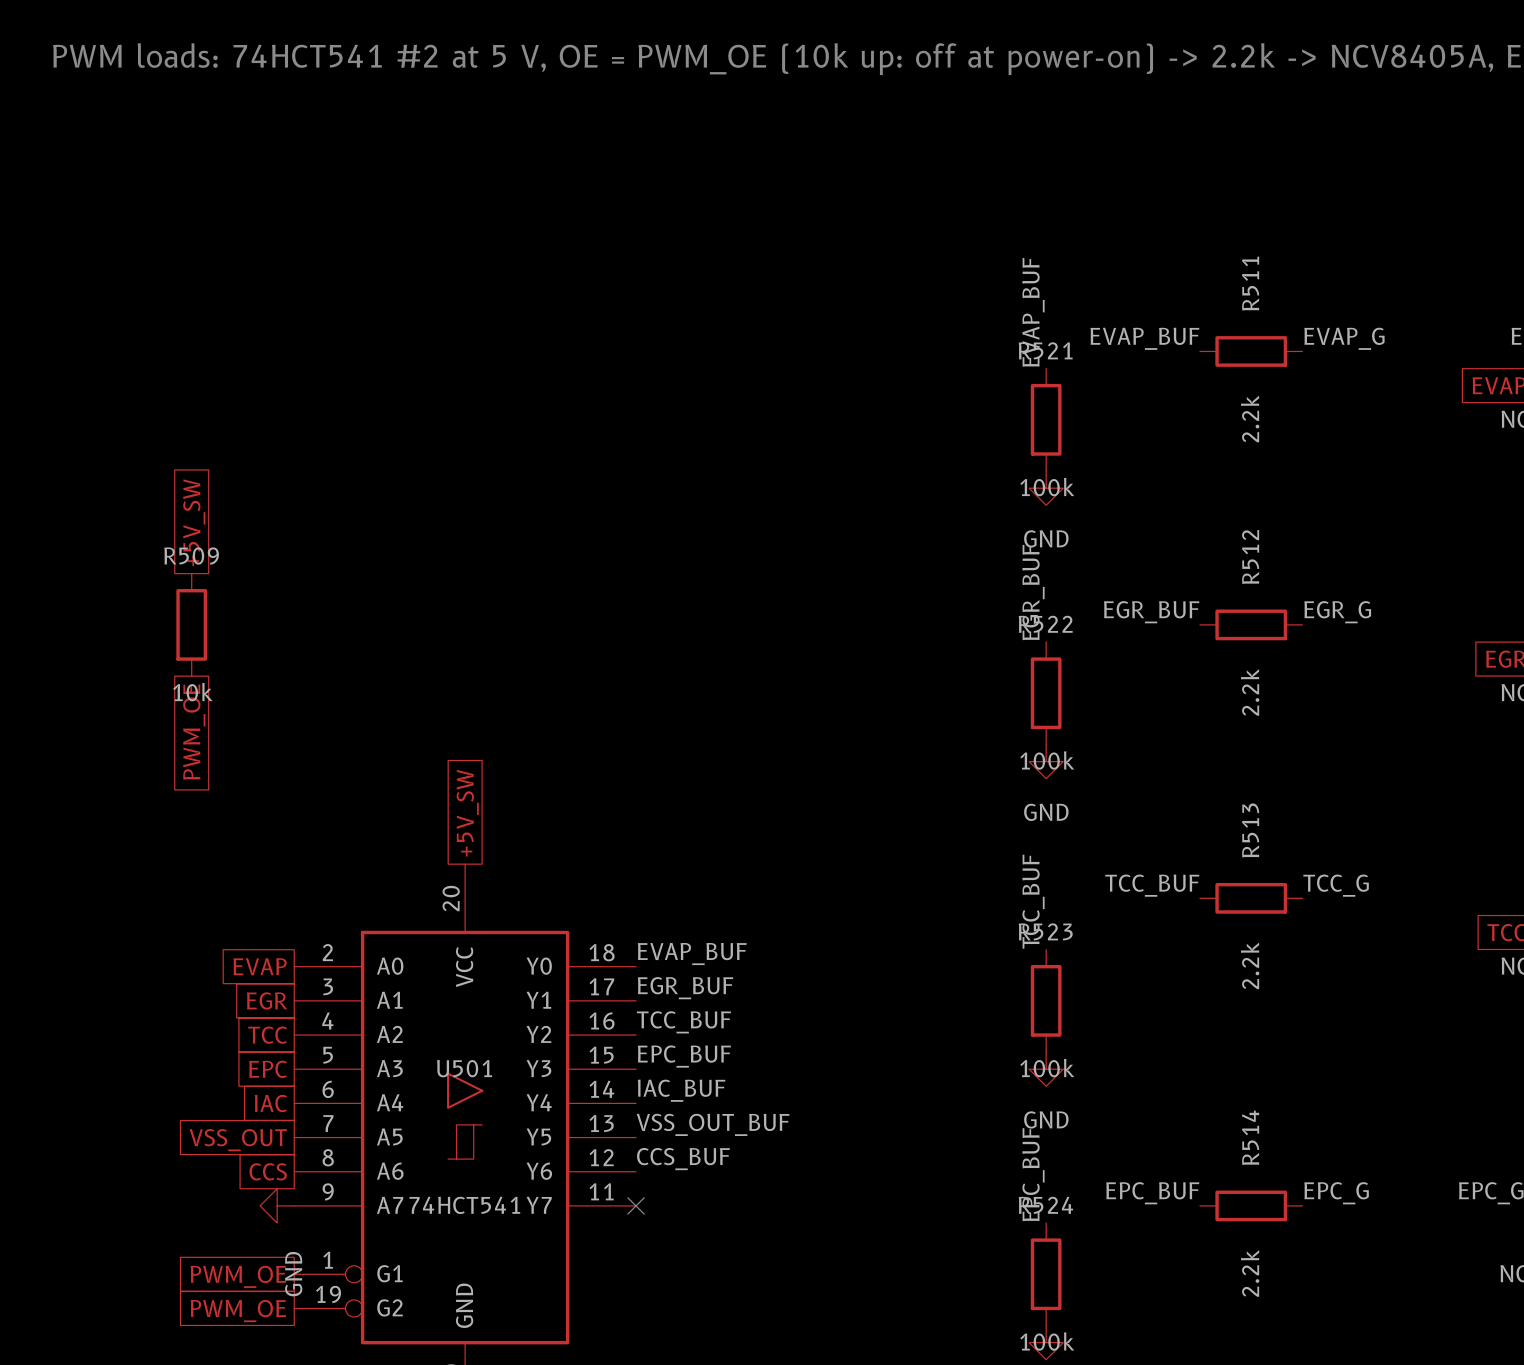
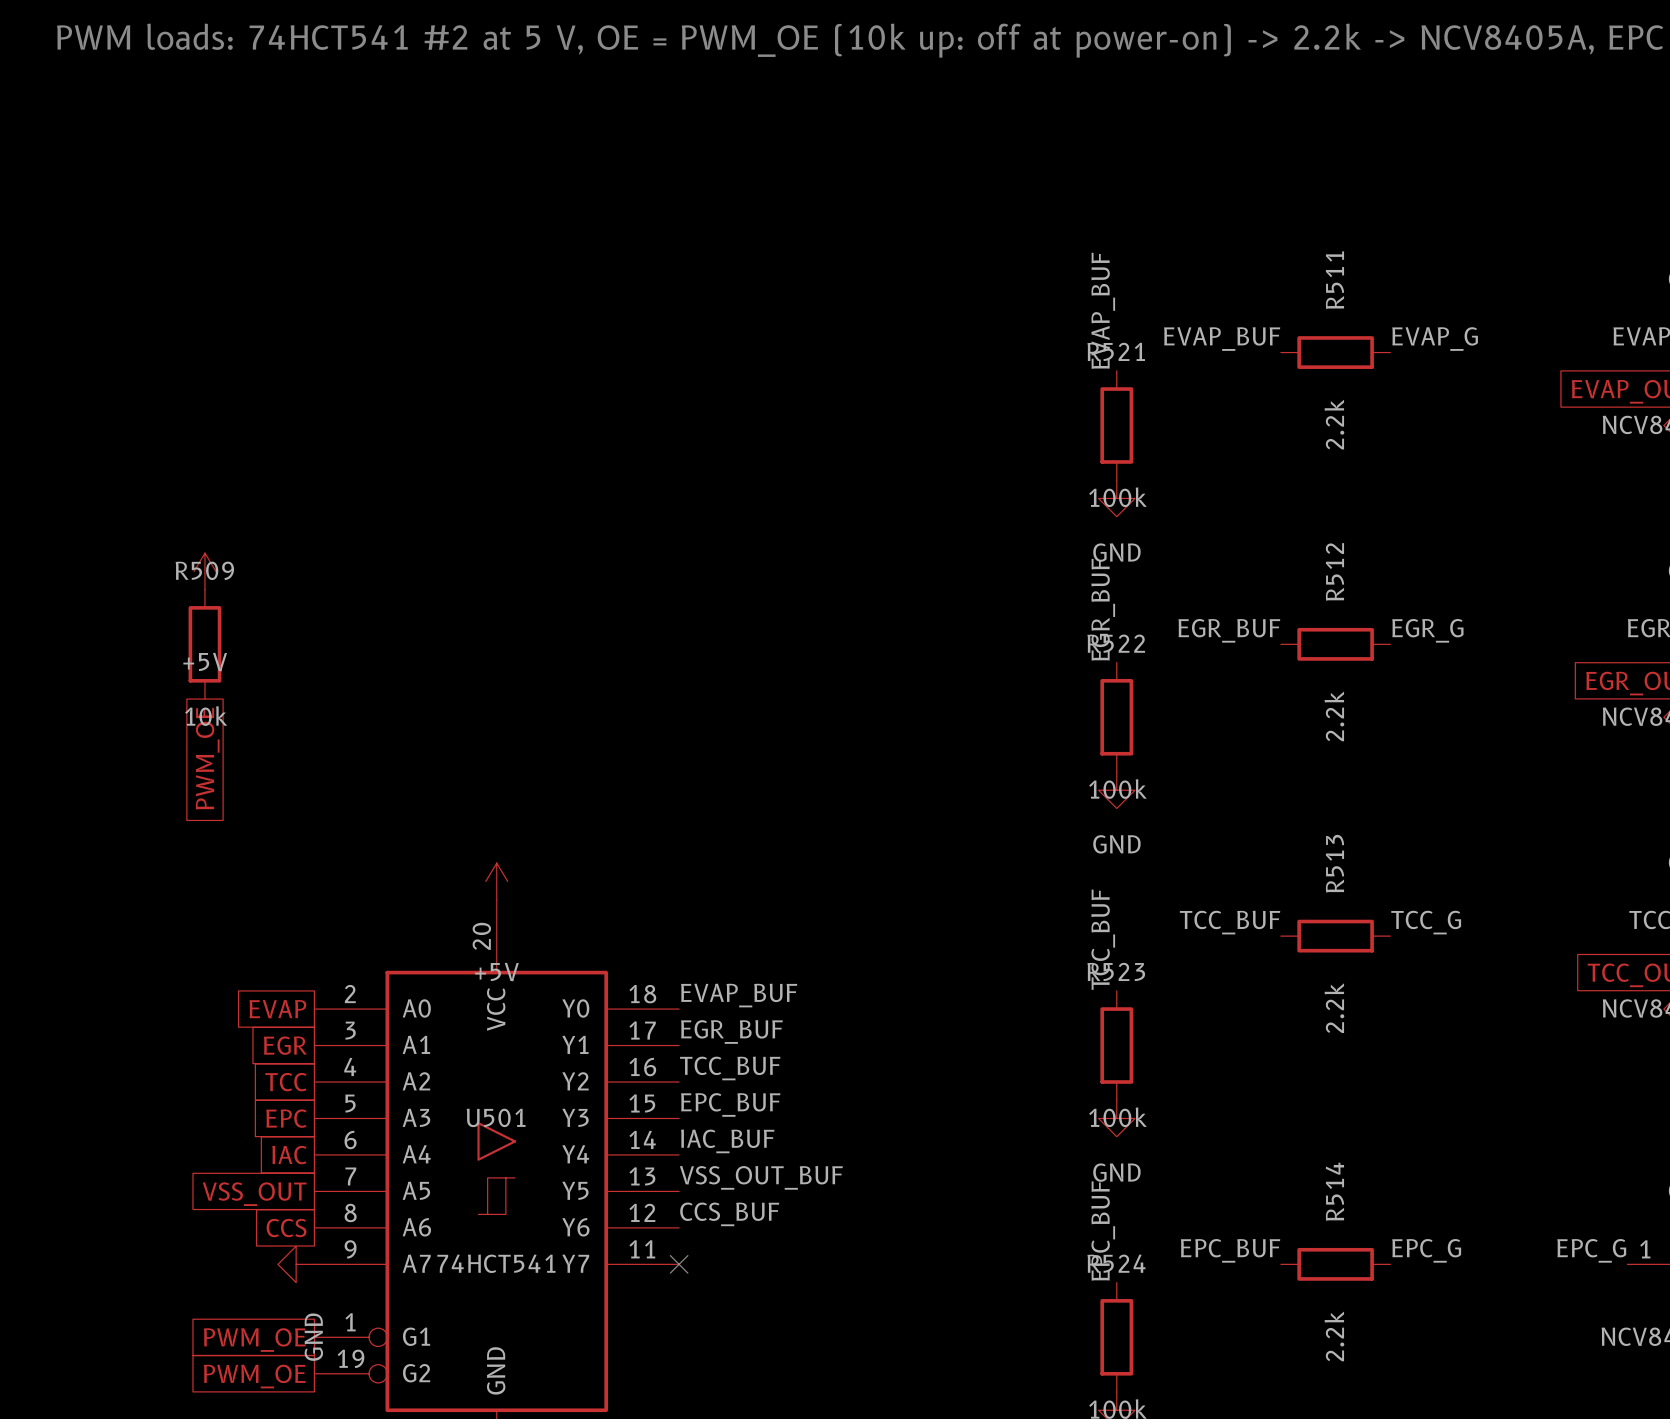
global label: +5V_SW (194, 522) -> none
power symbol: none -> +5V (204, 571)
global label: +5V_SW (467, 813) -> none
power symbol: none -> +5V (496, 881)

